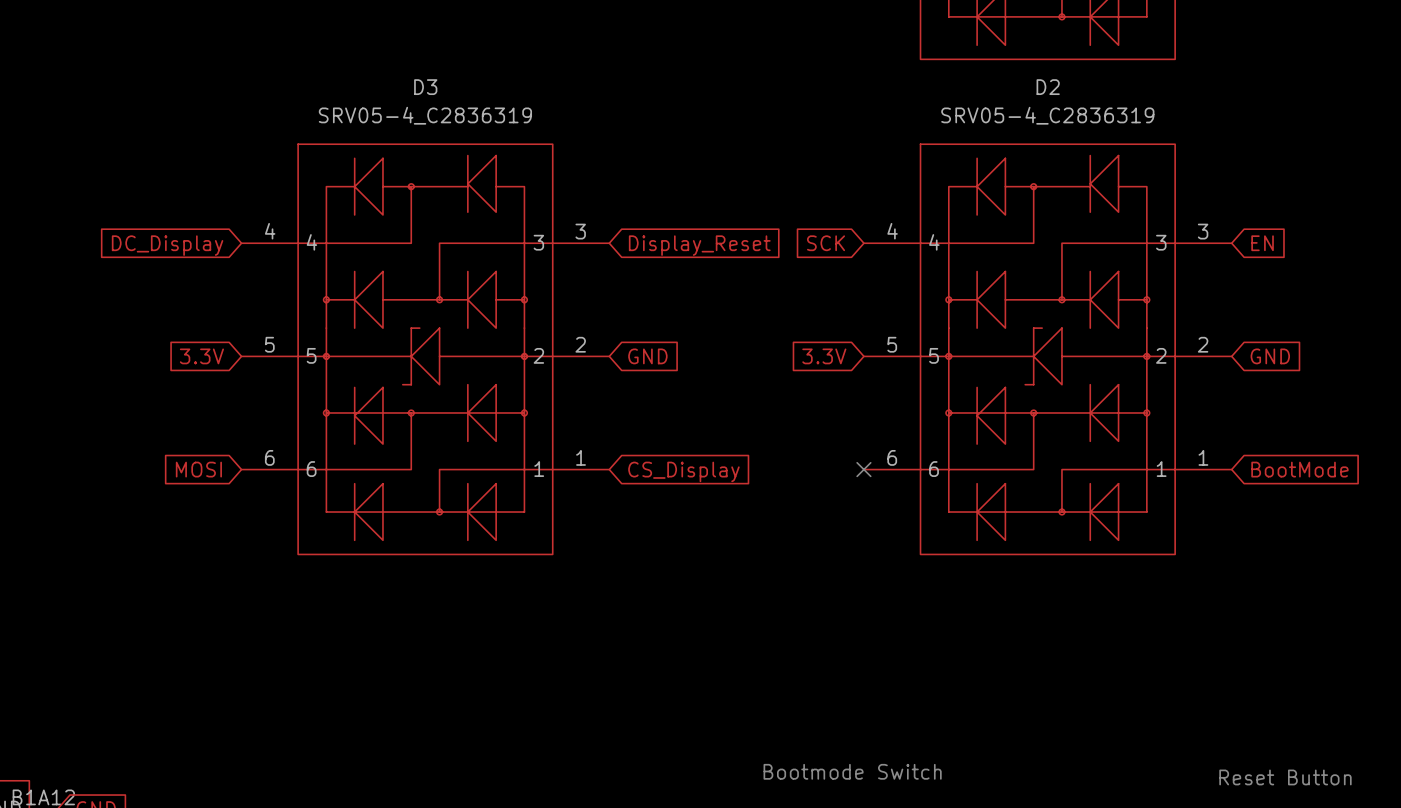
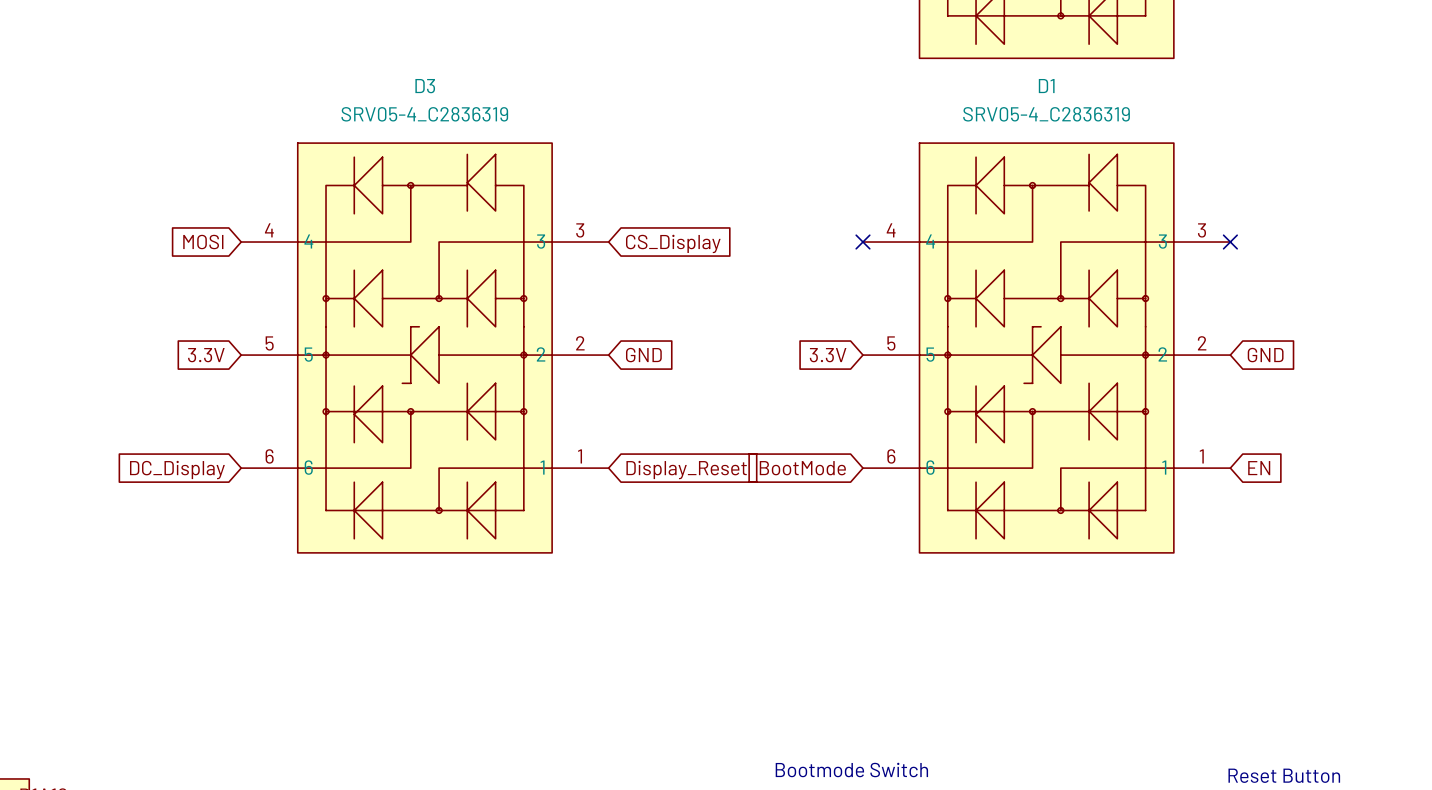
D2 name: D2 (1048, 87) -> D1 (1046, 86)
global label: SCK (826, 243) -> none
no-connect mark: none -> (862, 242)
no-connect mark: none -> (1230, 242)
global label: EN (1262, 243) -> none
global label: DC_Display (167, 245) -> MOSI (203, 242)
global label: Display_Reset (699, 245) -> CS_Display (673, 243)
global label: MOSI (198, 469) -> DC_Display (177, 470)
global label: none -> BootMode (802, 468)
no-connect mark: (863, 469) -> none
global label: BootMode (1299, 469) -> EN (1259, 468)
global label: CS_Display (683, 471) -> Display_Reset (686, 470)

